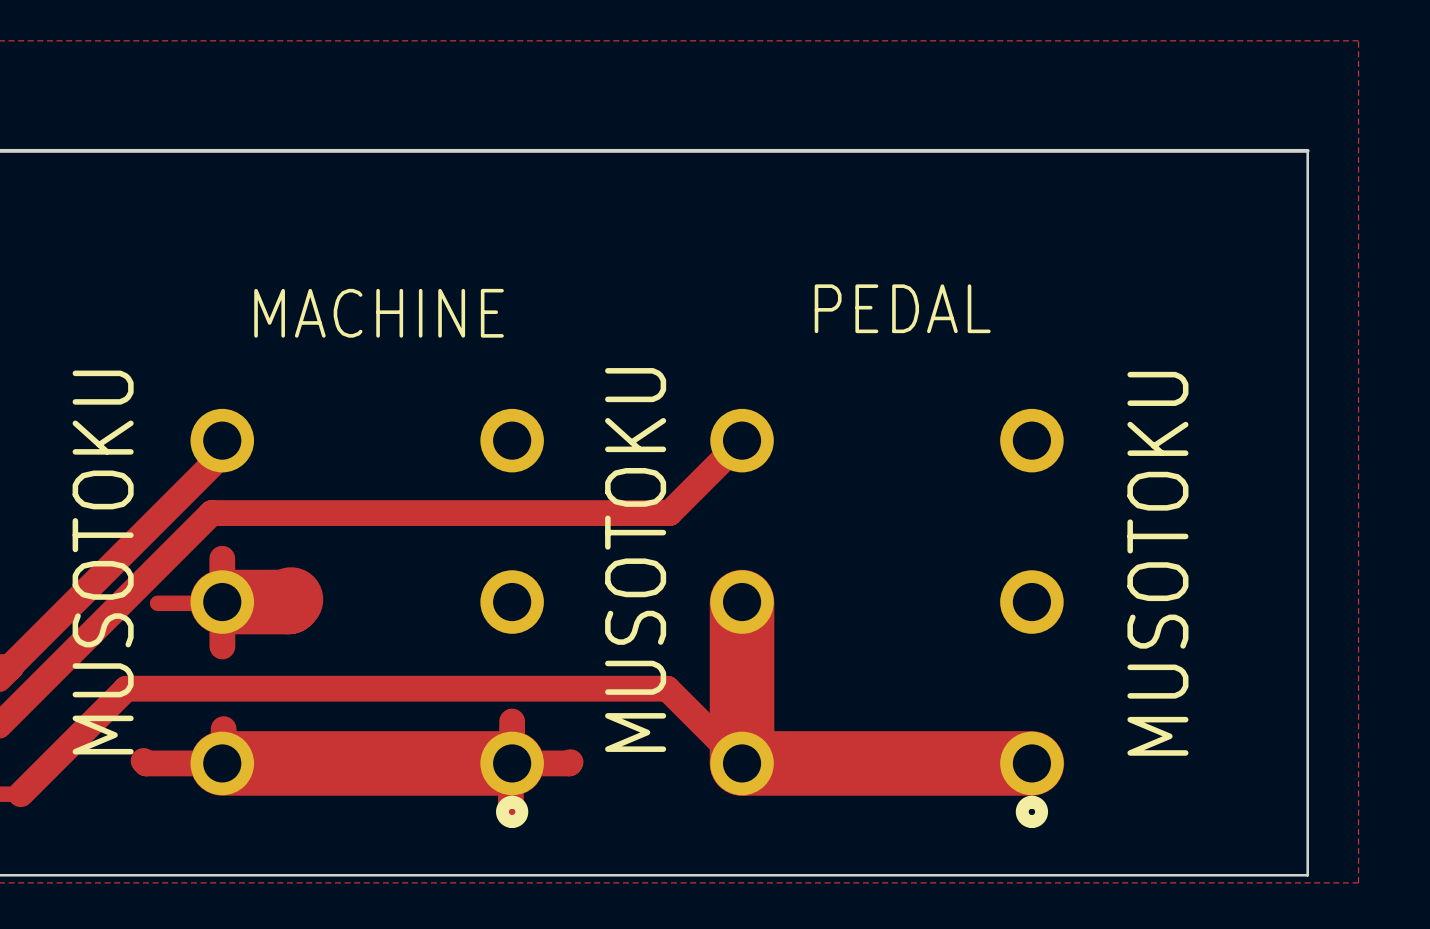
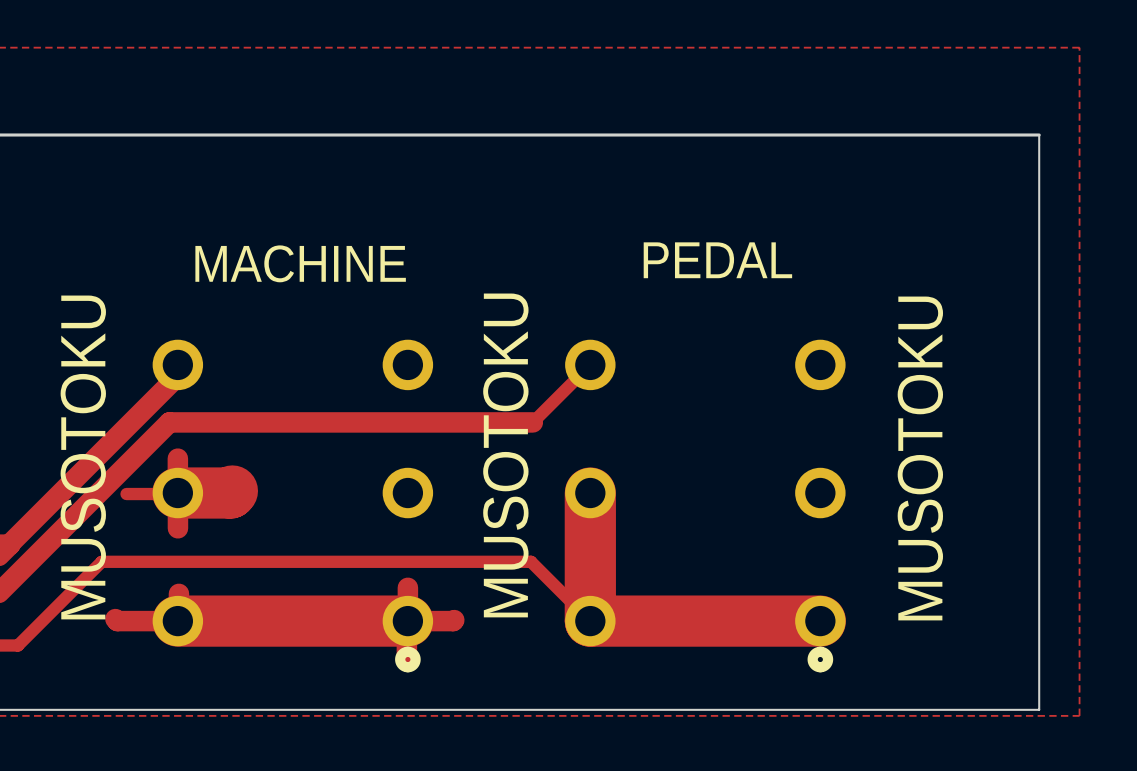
track width: thick (742, 440) (669, 513) -> thin (590, 364) (532, 422)
track width: thick (742, 763) (667, 688) (126, 688) (20, 794) -> thin (590, 621) (531, 561) (101, 561) (18, 645)

